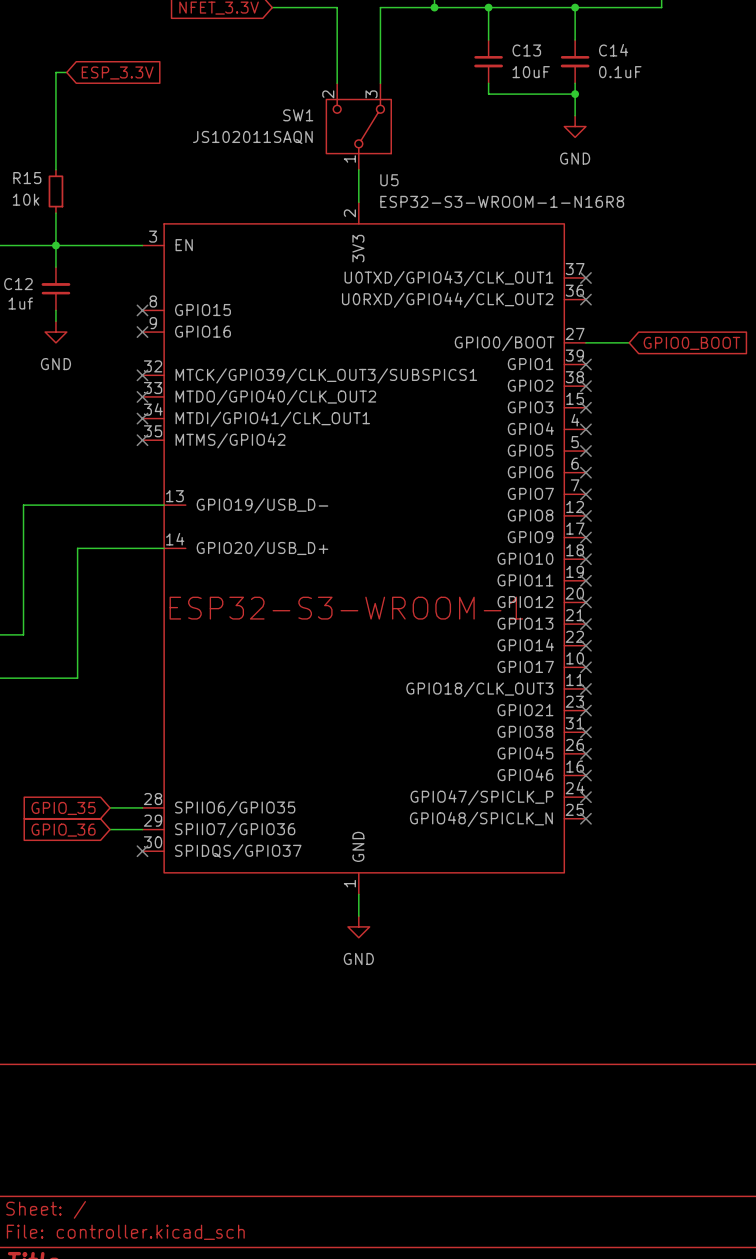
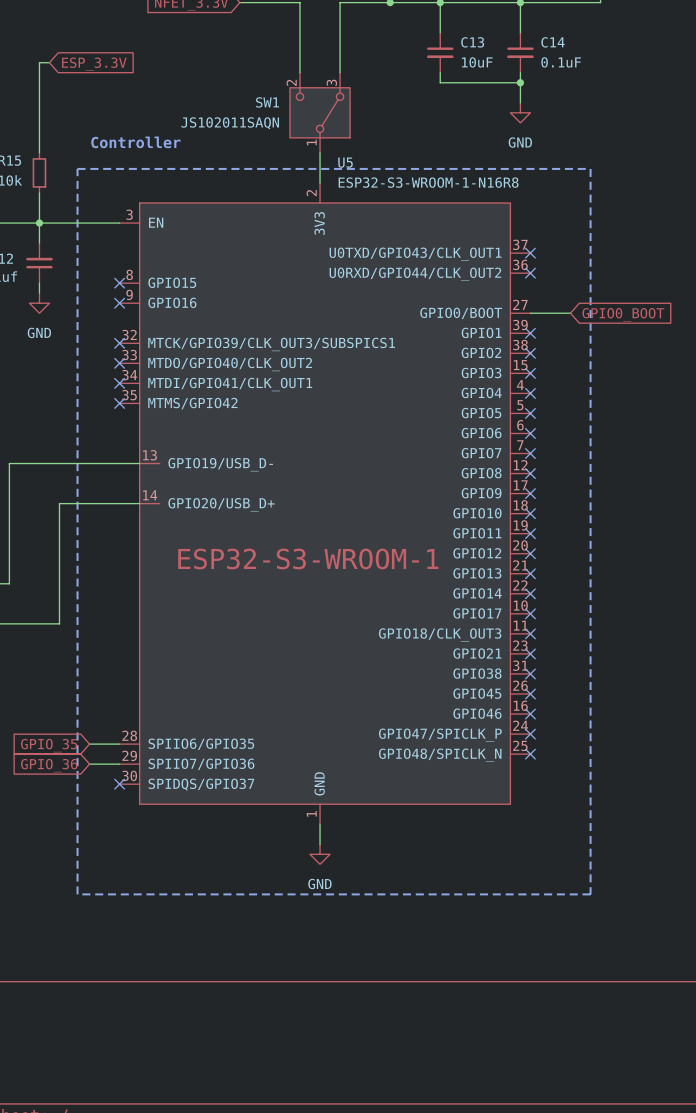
text: none -> Controller (135, 142)
line: none -> (77, 168) (590, 168) (590, 894) (77, 894) (77, 168)

